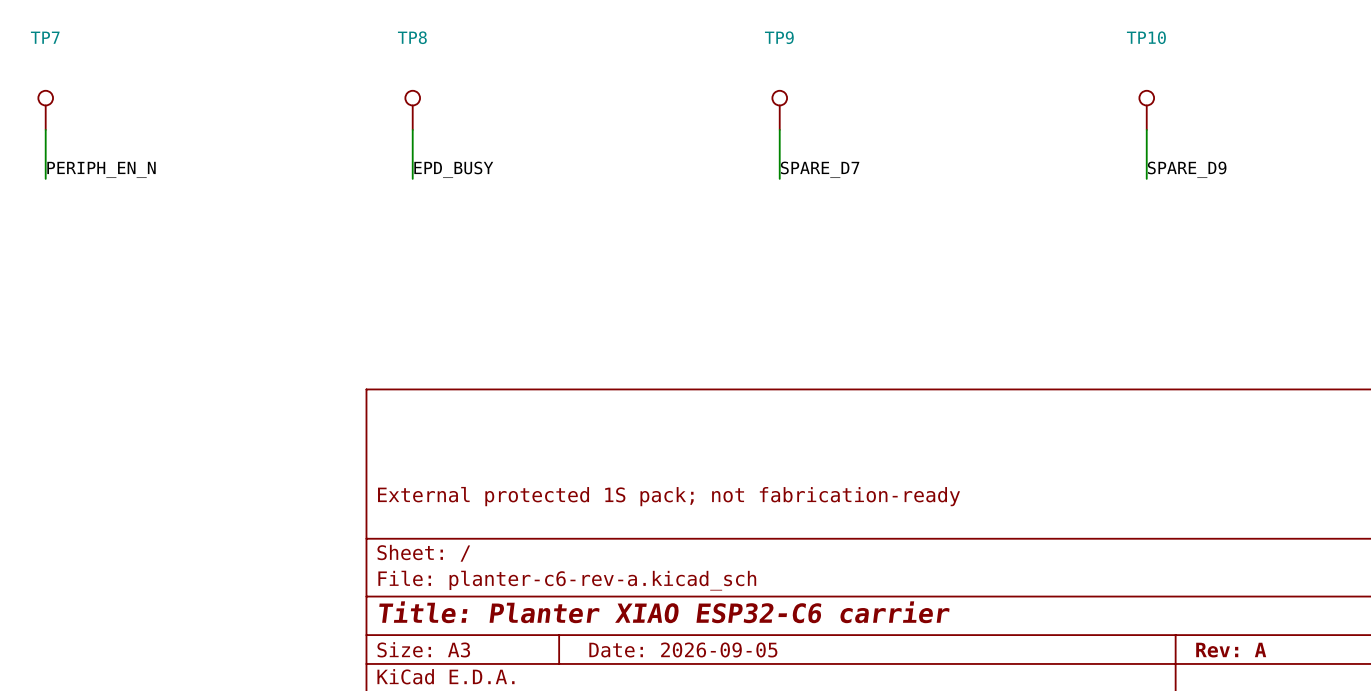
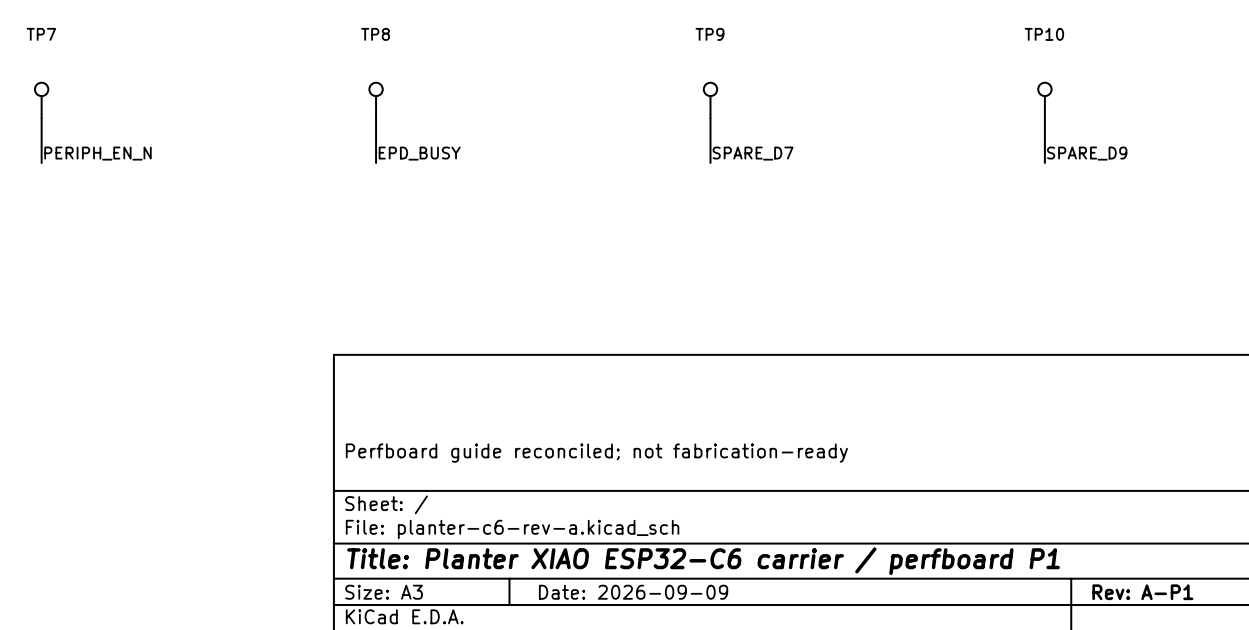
title block: External protected 1S pack; not fabrication-ready (669, 496) -> Perfboard guide reconciled; not fabrication-ready (596, 453)
title block: Title: Planter XIAO ESP32-C6 carrier (664, 612) -> Title: Planter XIAO ESP32-C6 carrier / perfboard P1 (703, 561)
title block: Date: 2026-09-05 (683, 649) -> Date: 2026-09-09 (633, 592)
title block: Rev: A (1231, 650) -> Rev: A-P1 (1142, 592)

